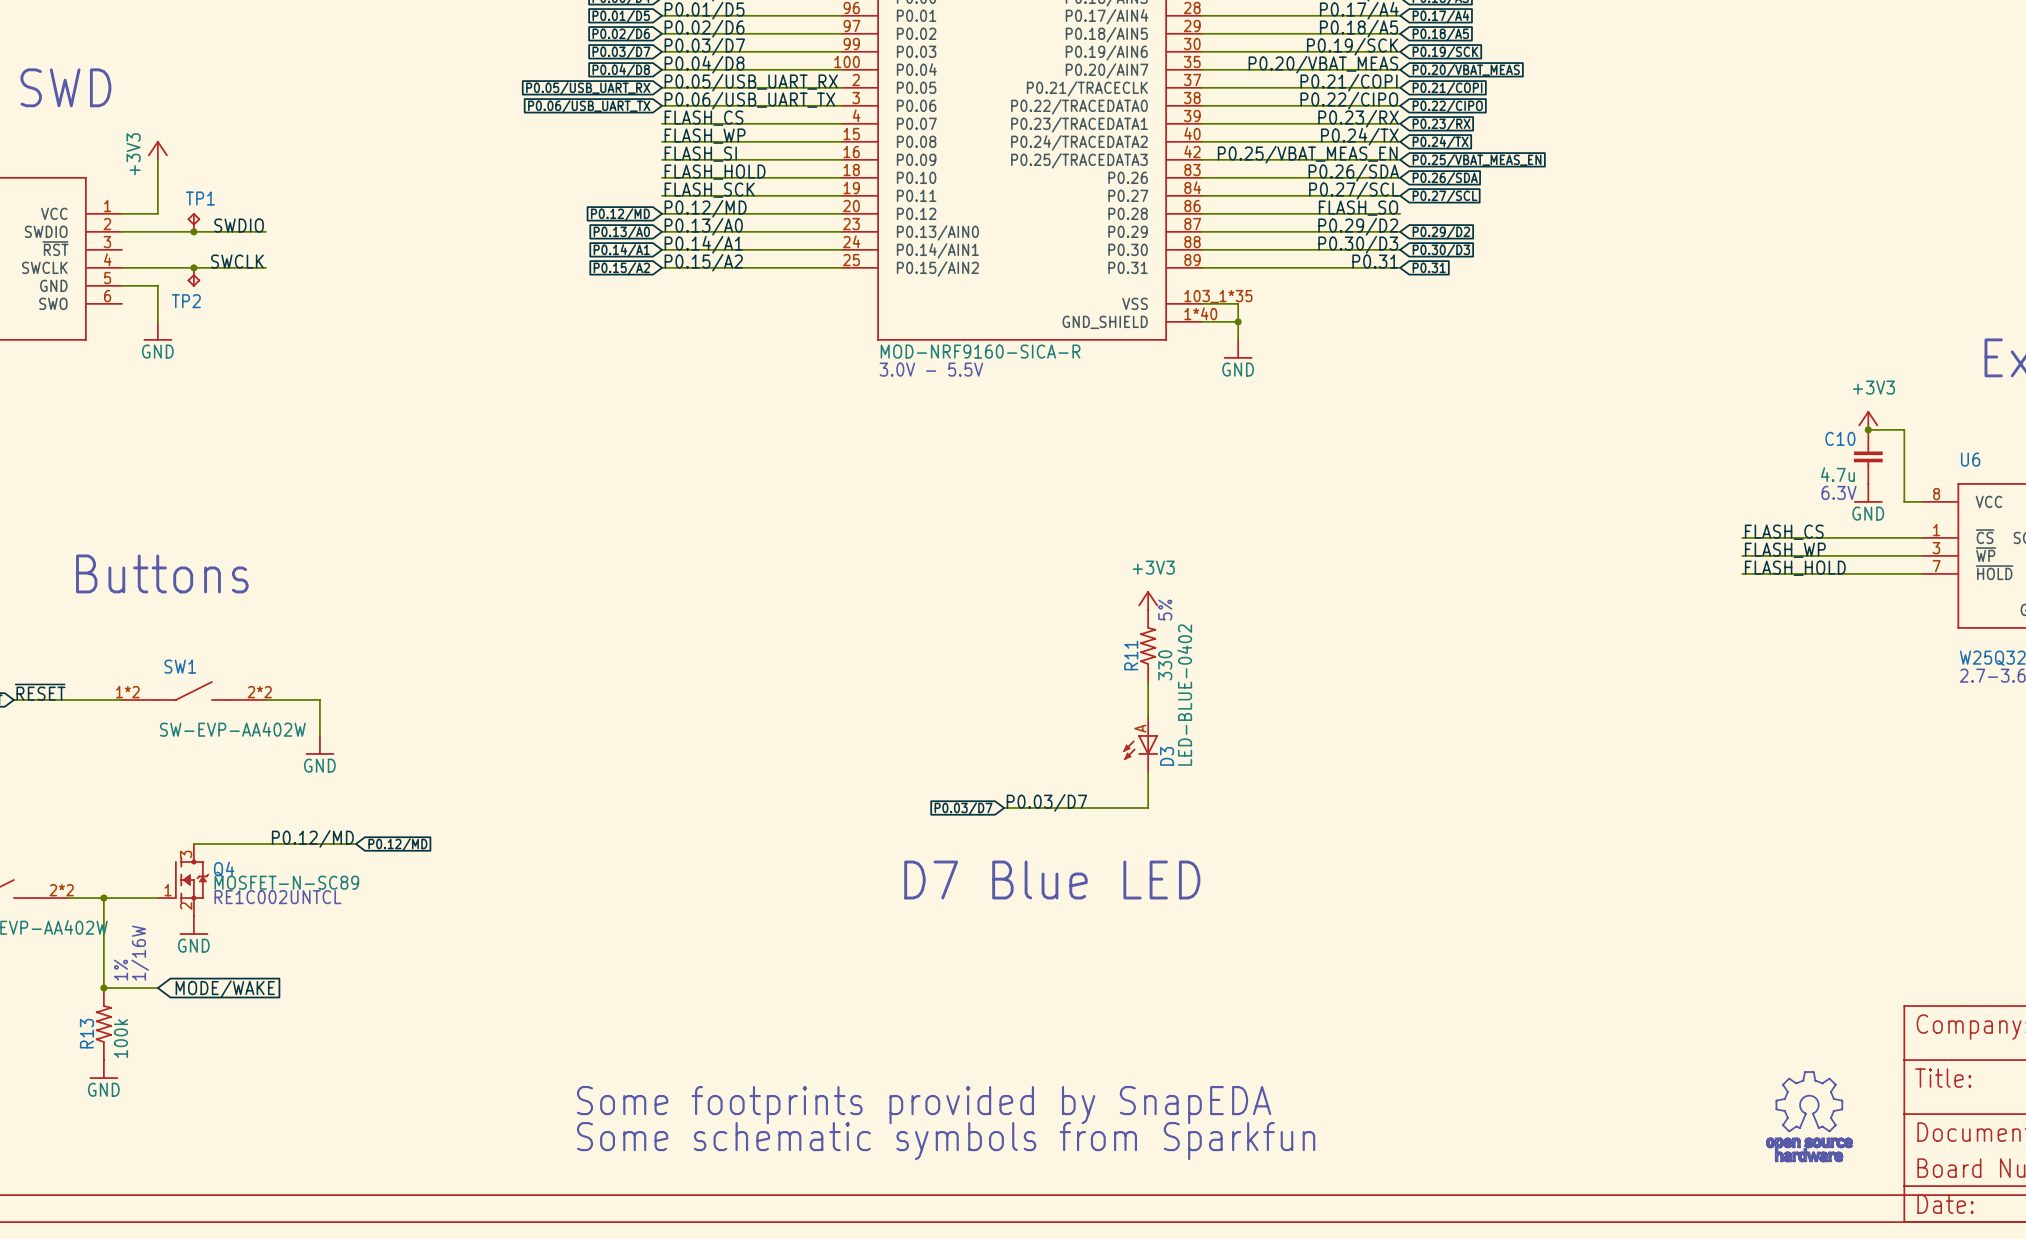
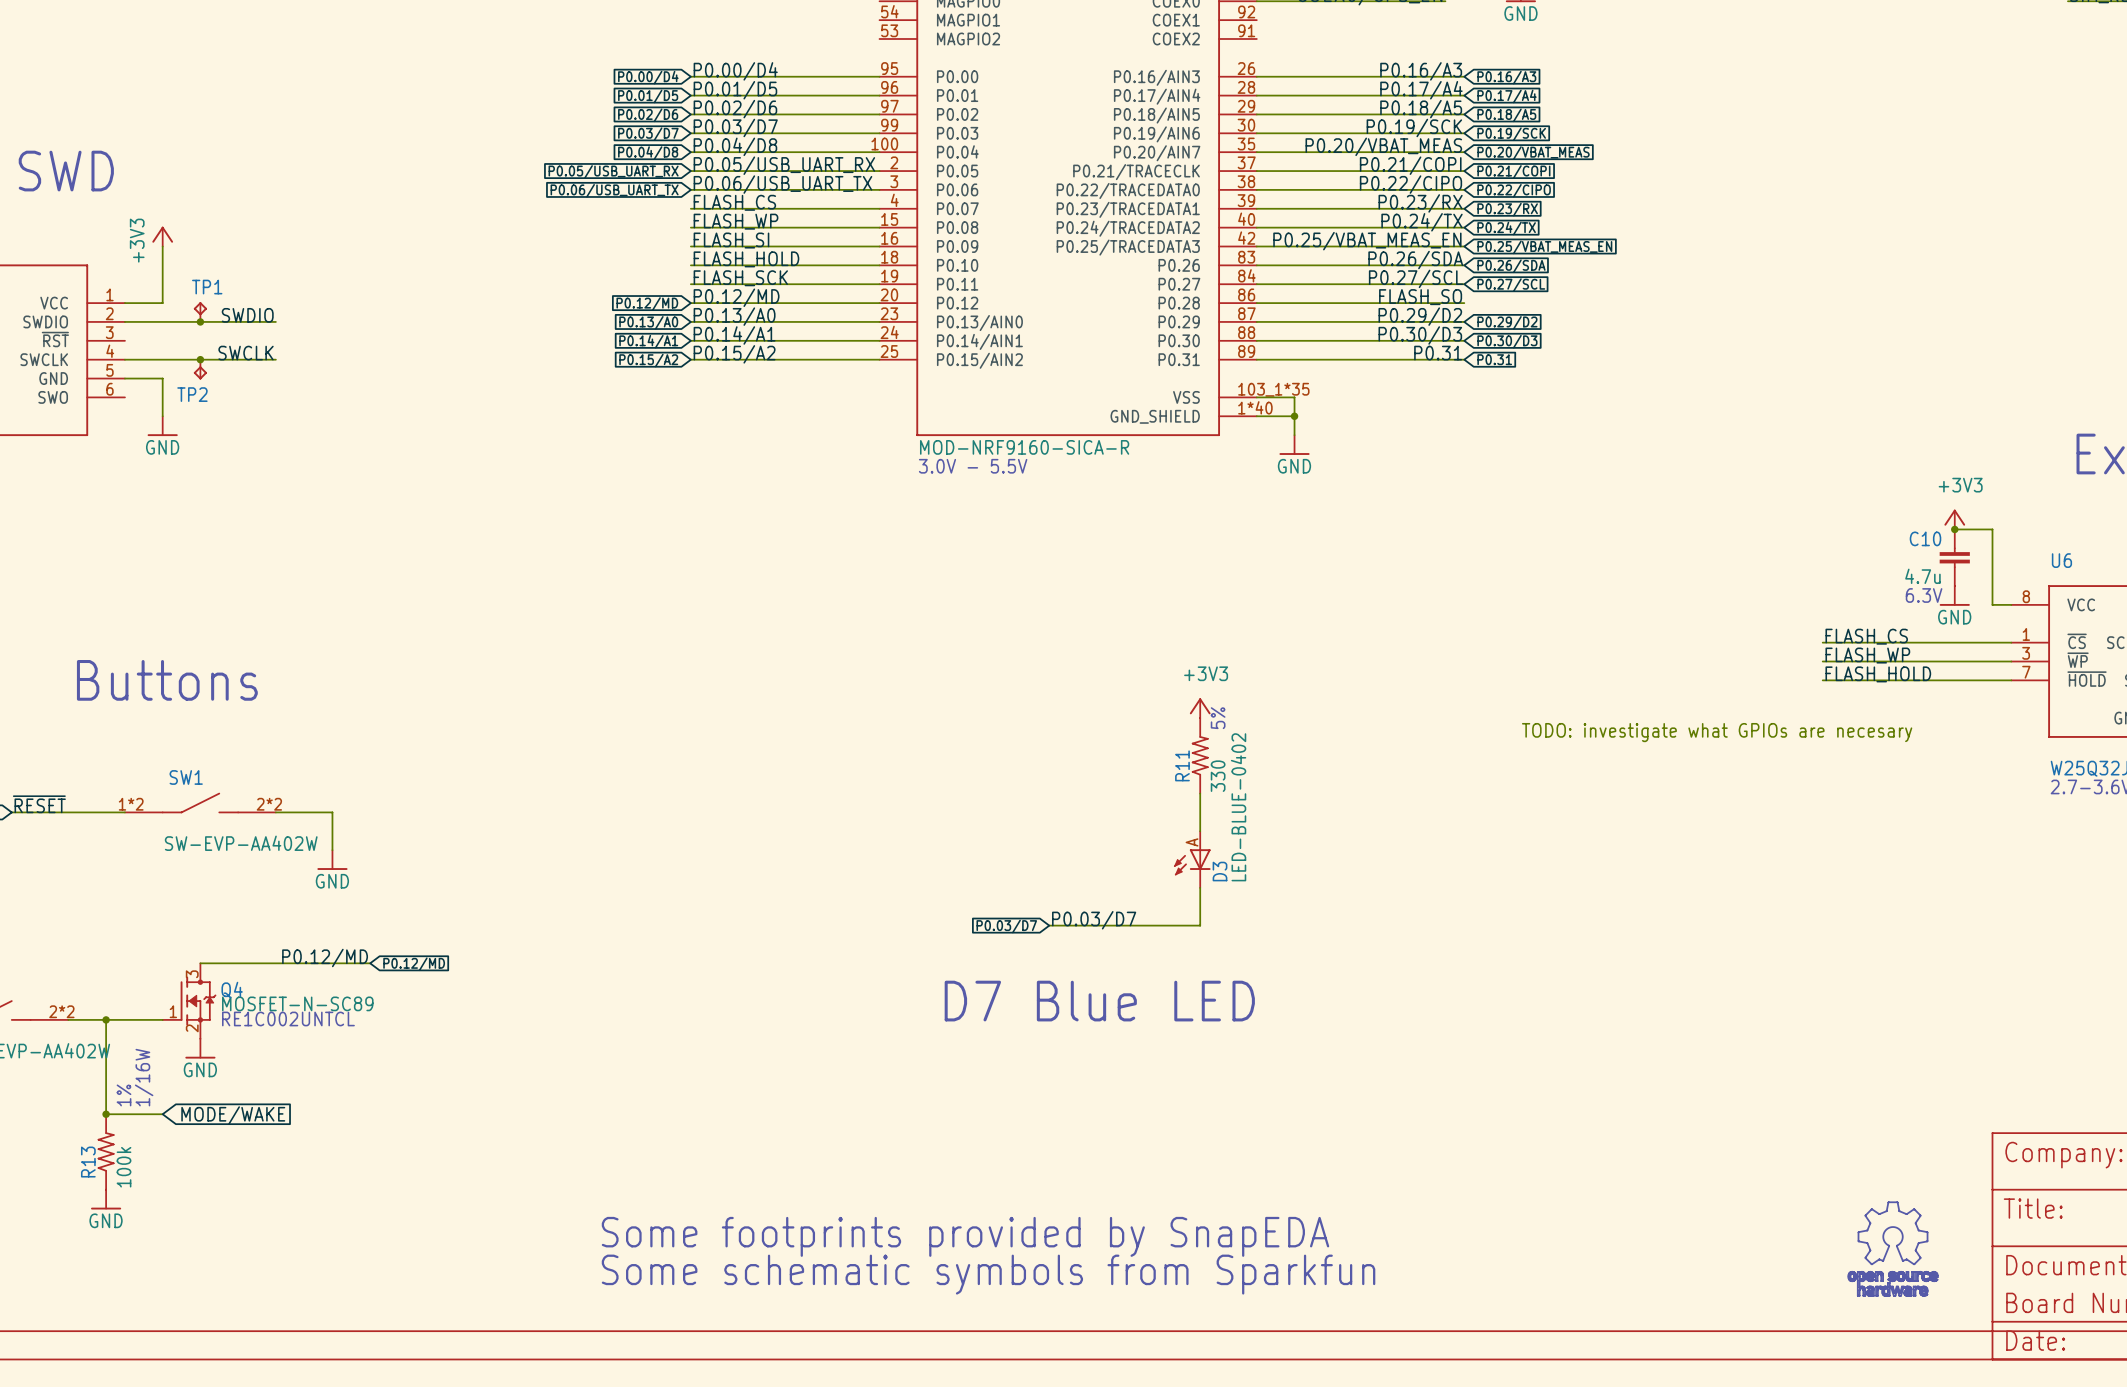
text: none -> TODO: investigate what GPIOs are necesary (1717, 732)

